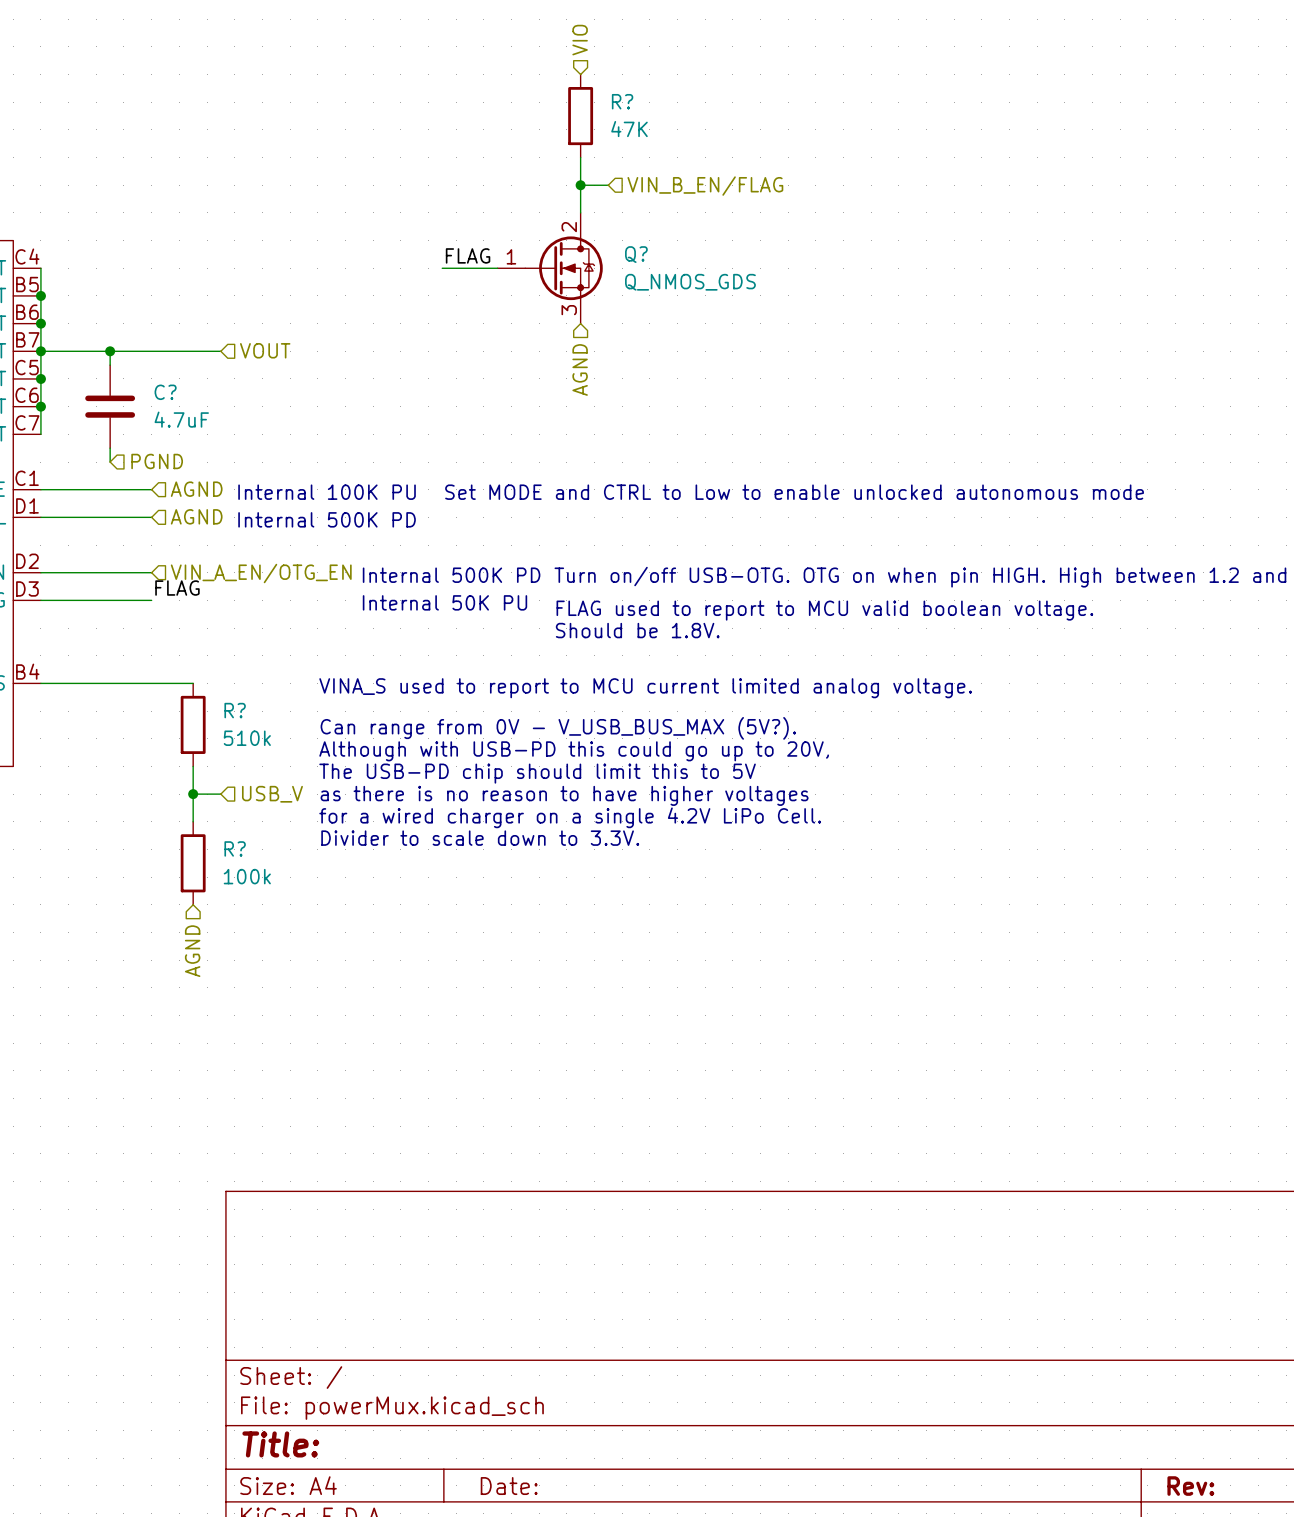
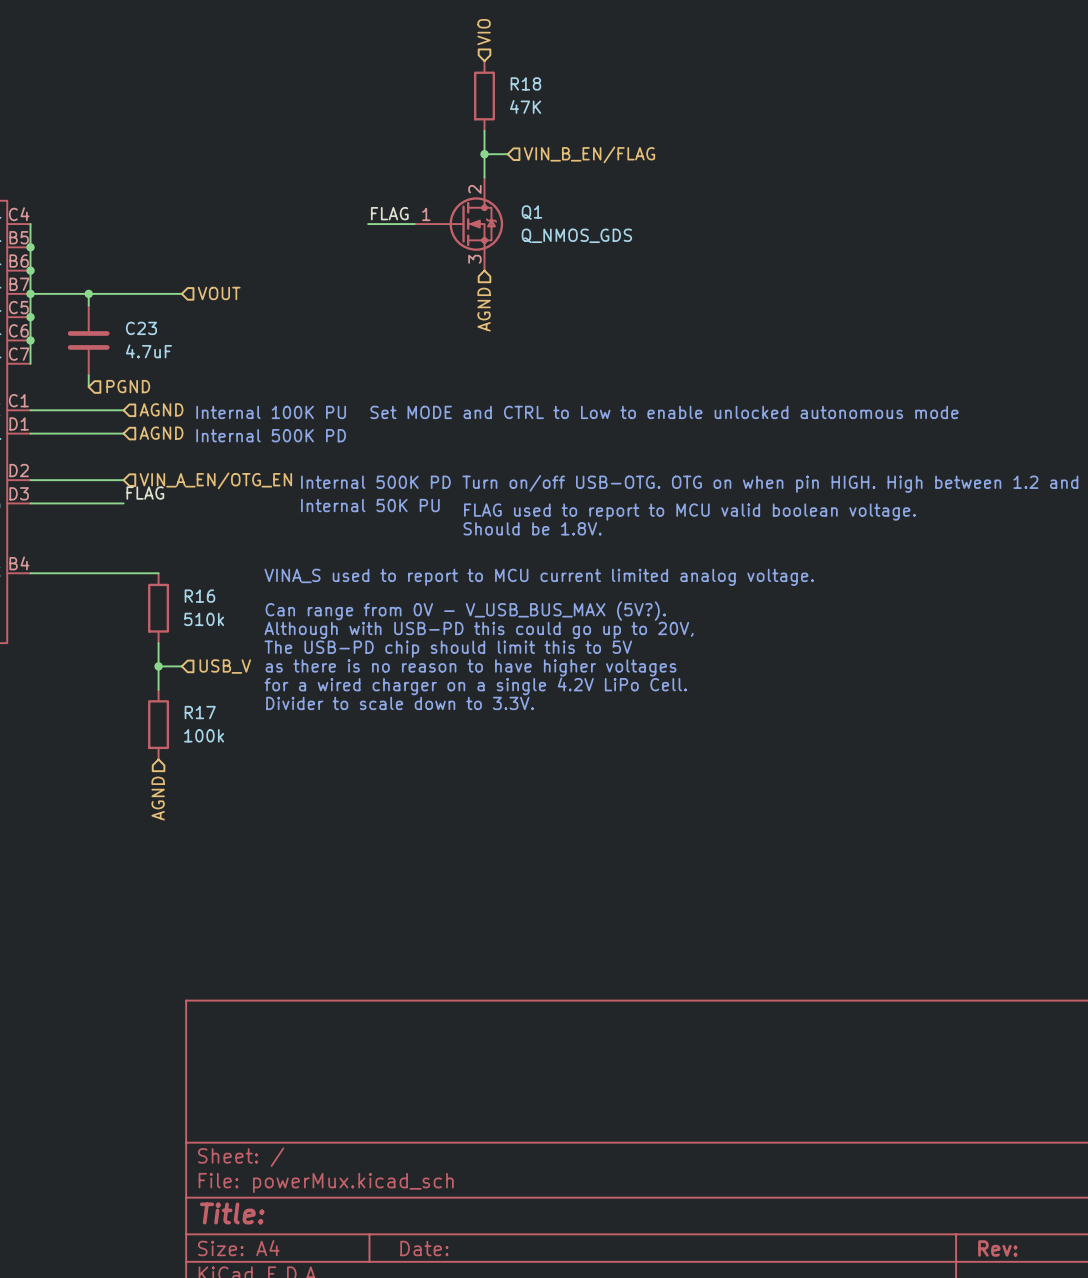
R? name: R? (622, 101) -> R18 (525, 83)
Q? name: Q? (636, 254) -> Q1 (531, 212)
C? name: C? (165, 392) -> C23 (141, 328)
R? name: R? (235, 710) -> R16 (199, 596)
R? name: R? (235, 848) -> R17 (200, 712)

